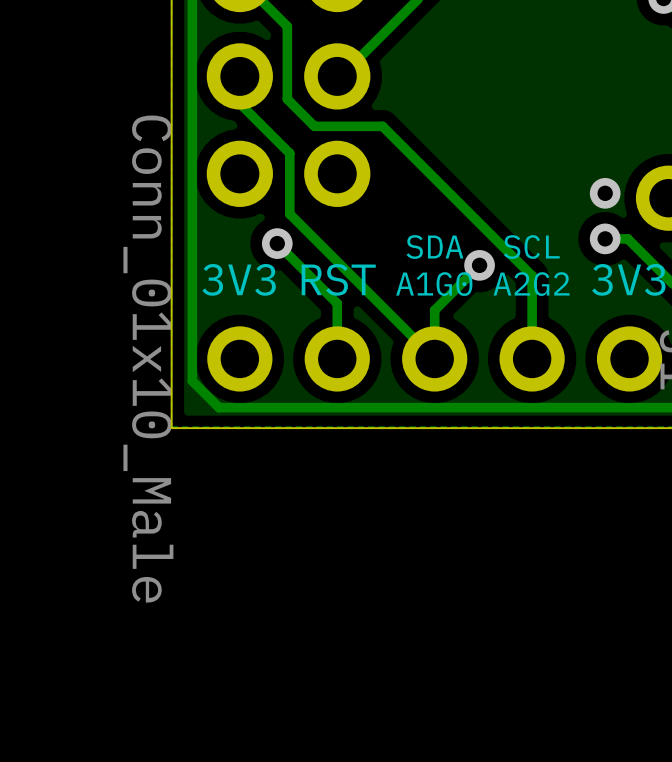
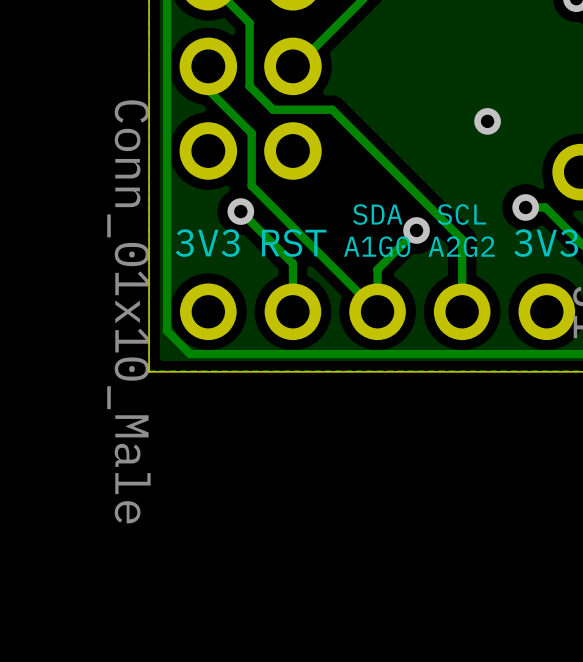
via position: (605, 193) -> (487, 121)

